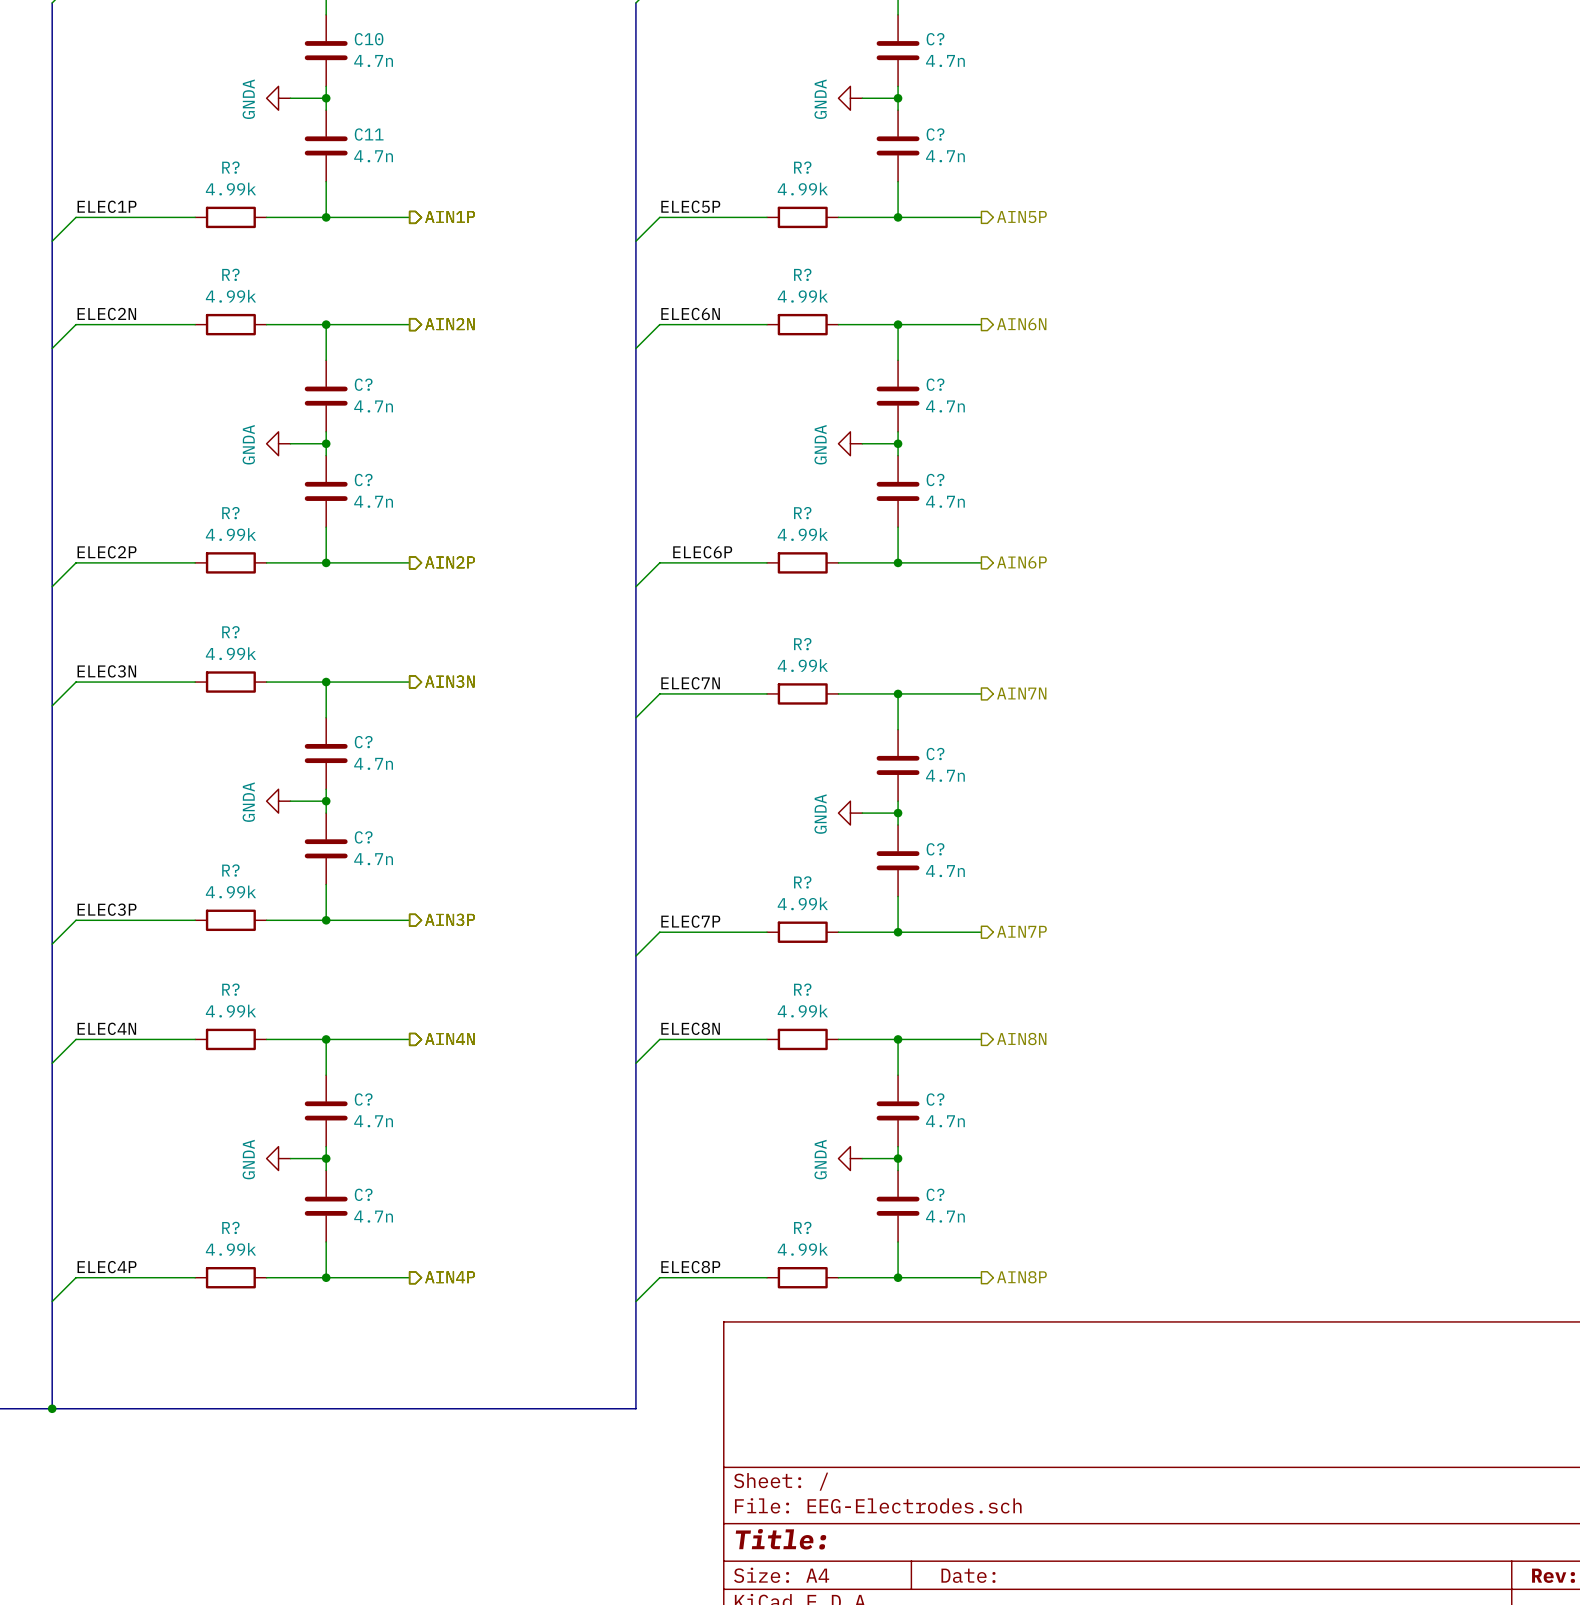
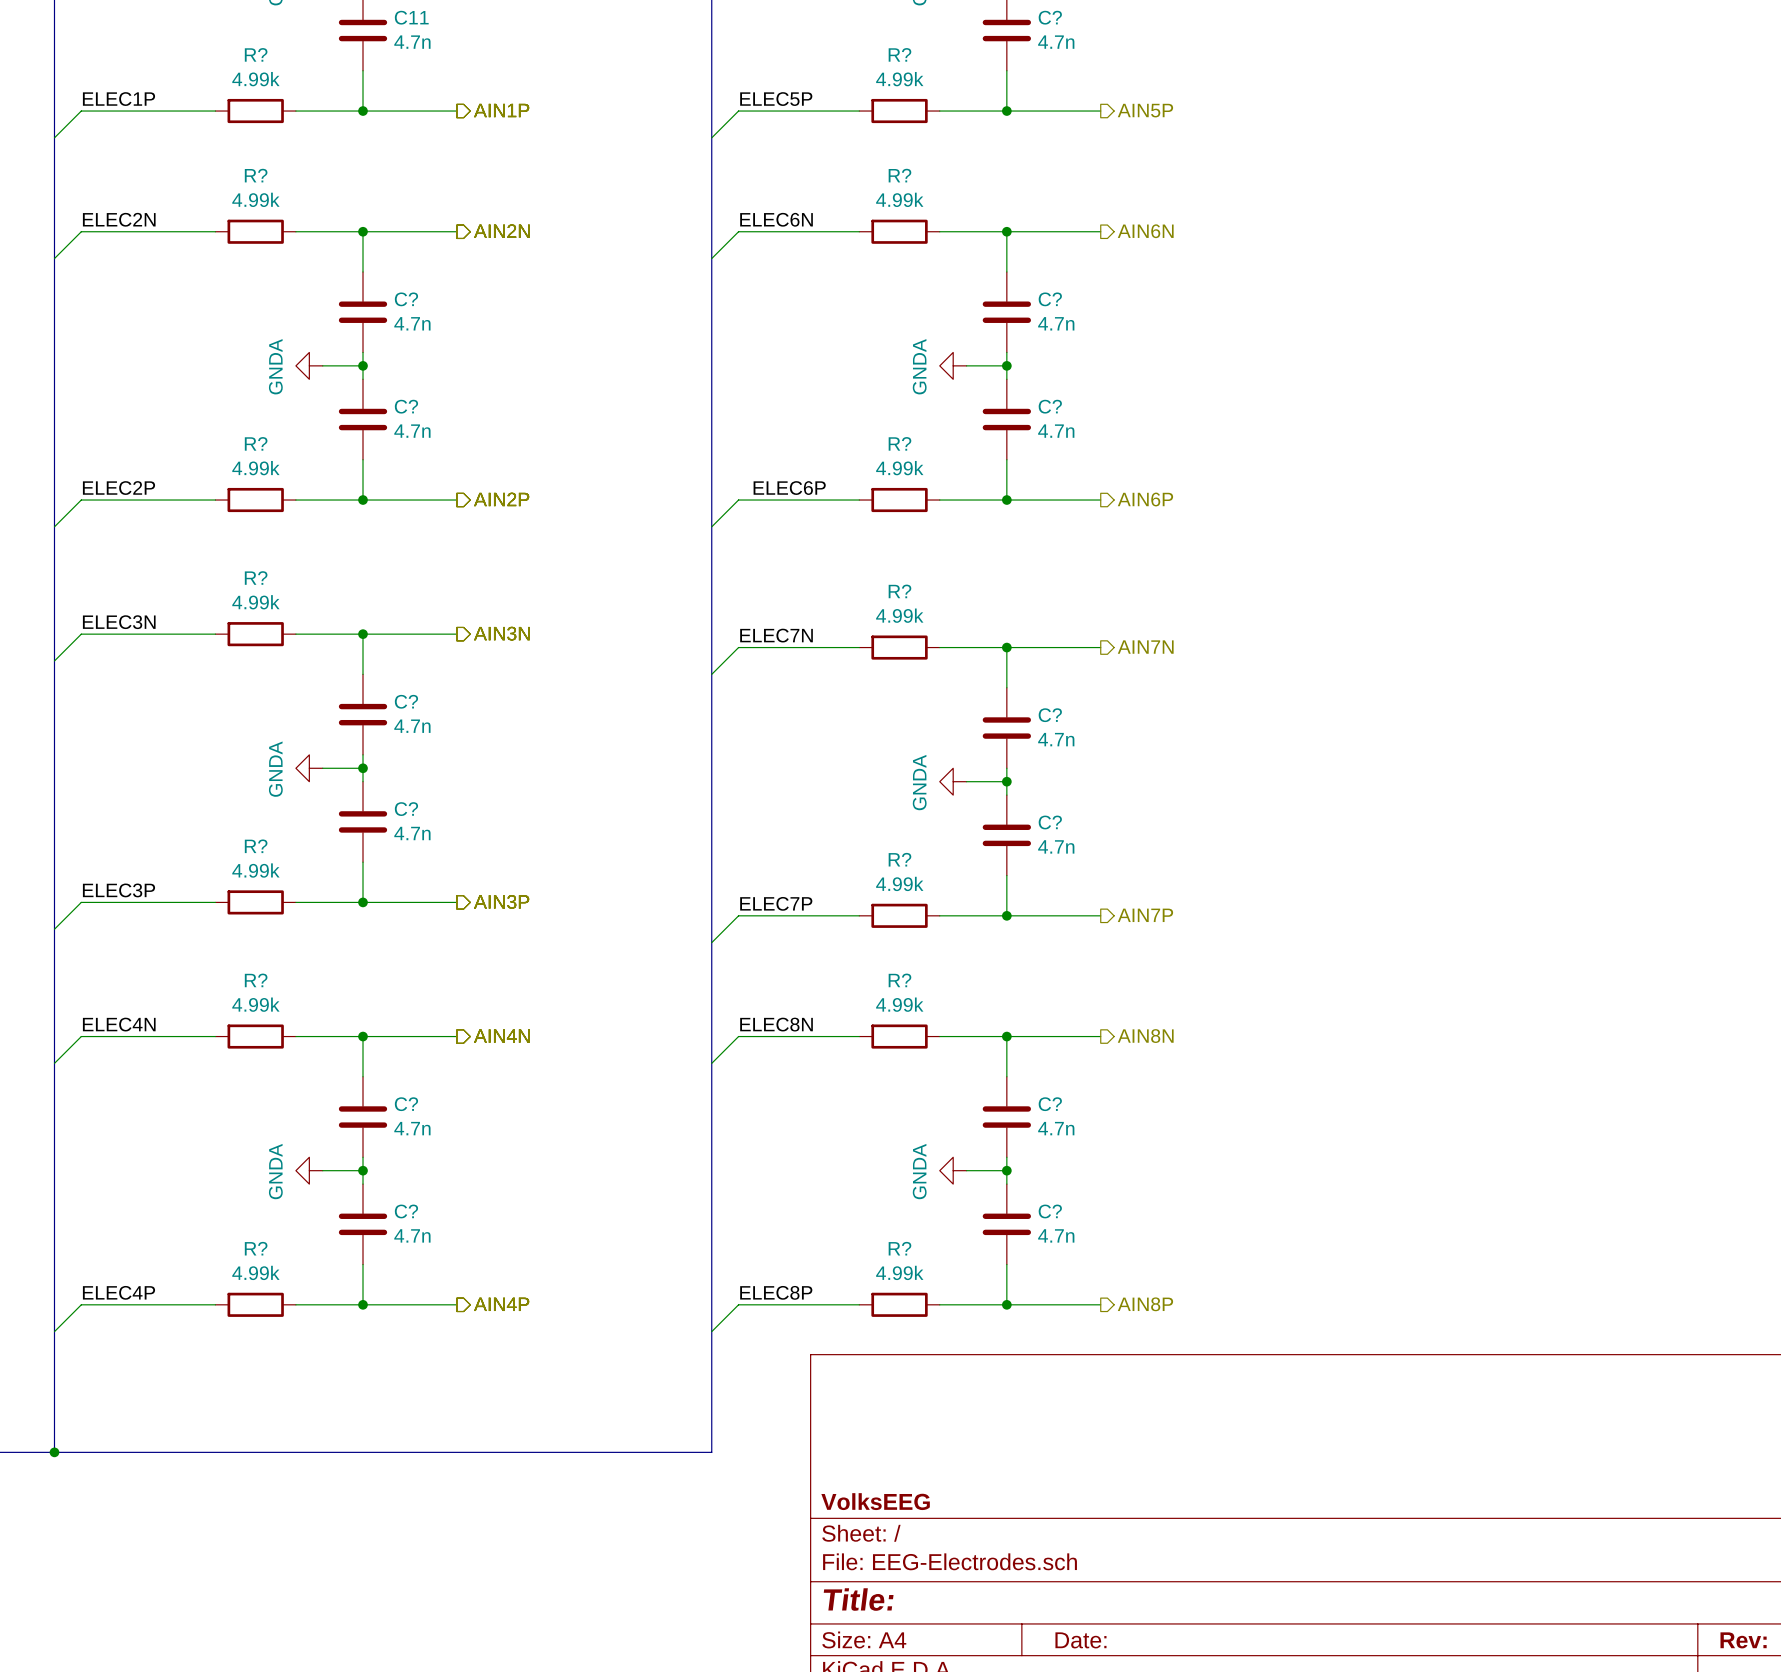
title block: none -> VolksEEG (875, 1501)

